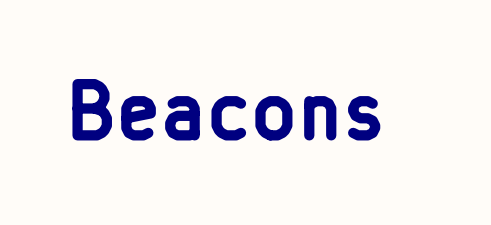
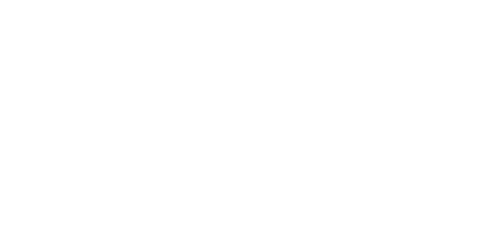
text: Beacons (226, 109) -> none

